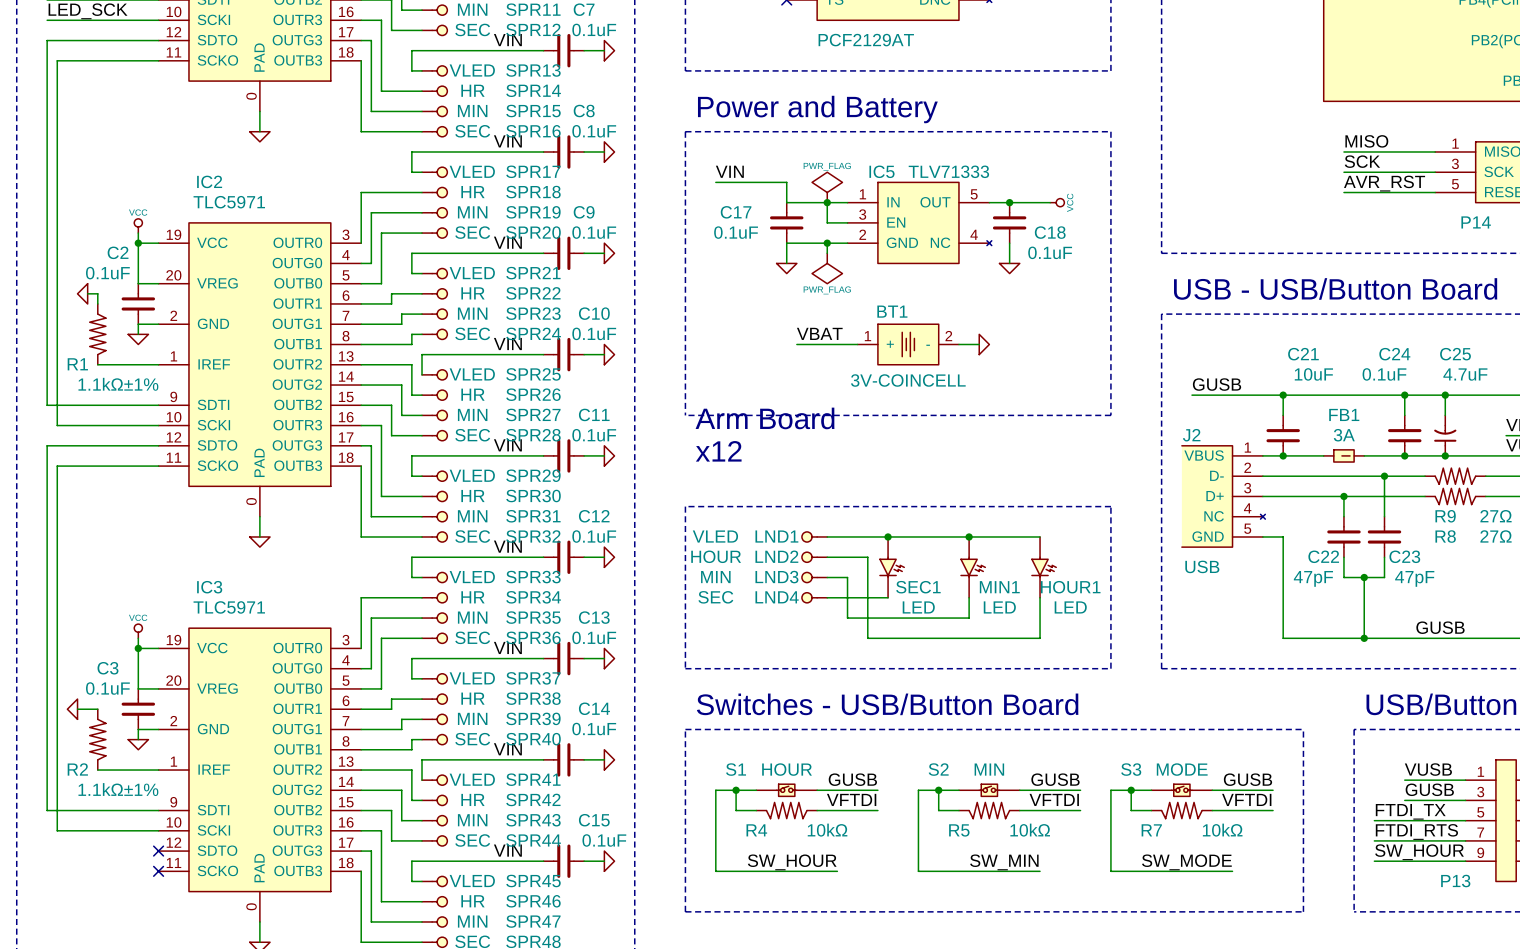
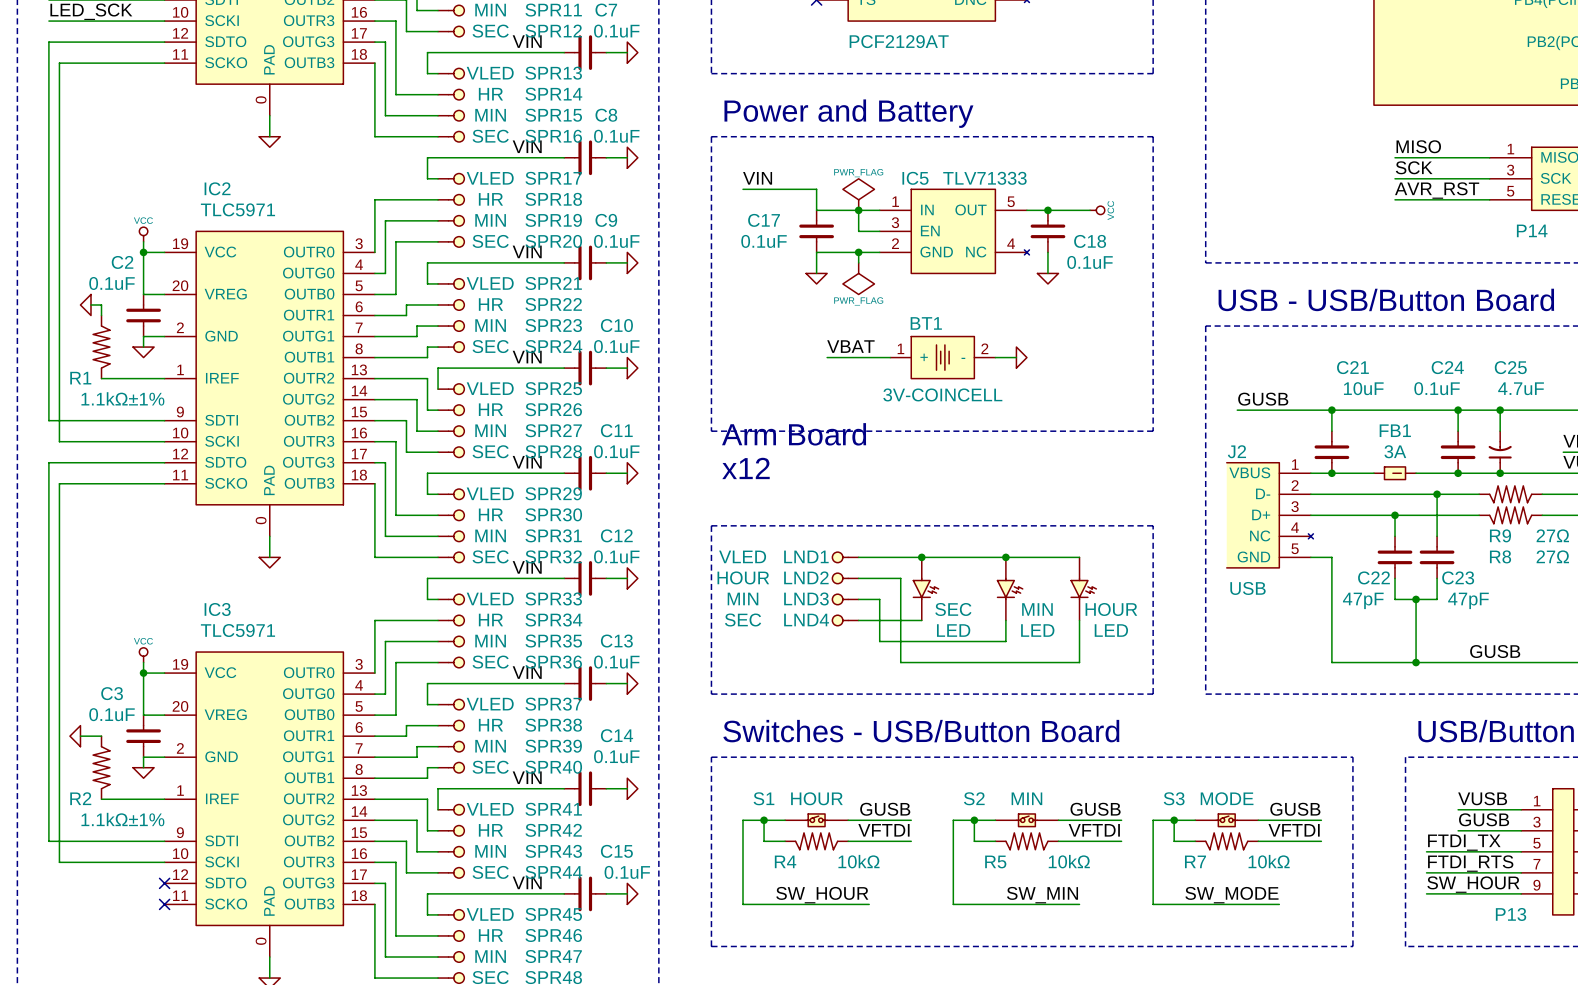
SEC1 name: SEC1 (918, 587) -> SEC (953, 609)
MIN1 name: MIN1 (999, 587) -> MIN (1037, 609)
HOUR1 name: HOUR1 (1070, 587) -> HOUR (1111, 609)

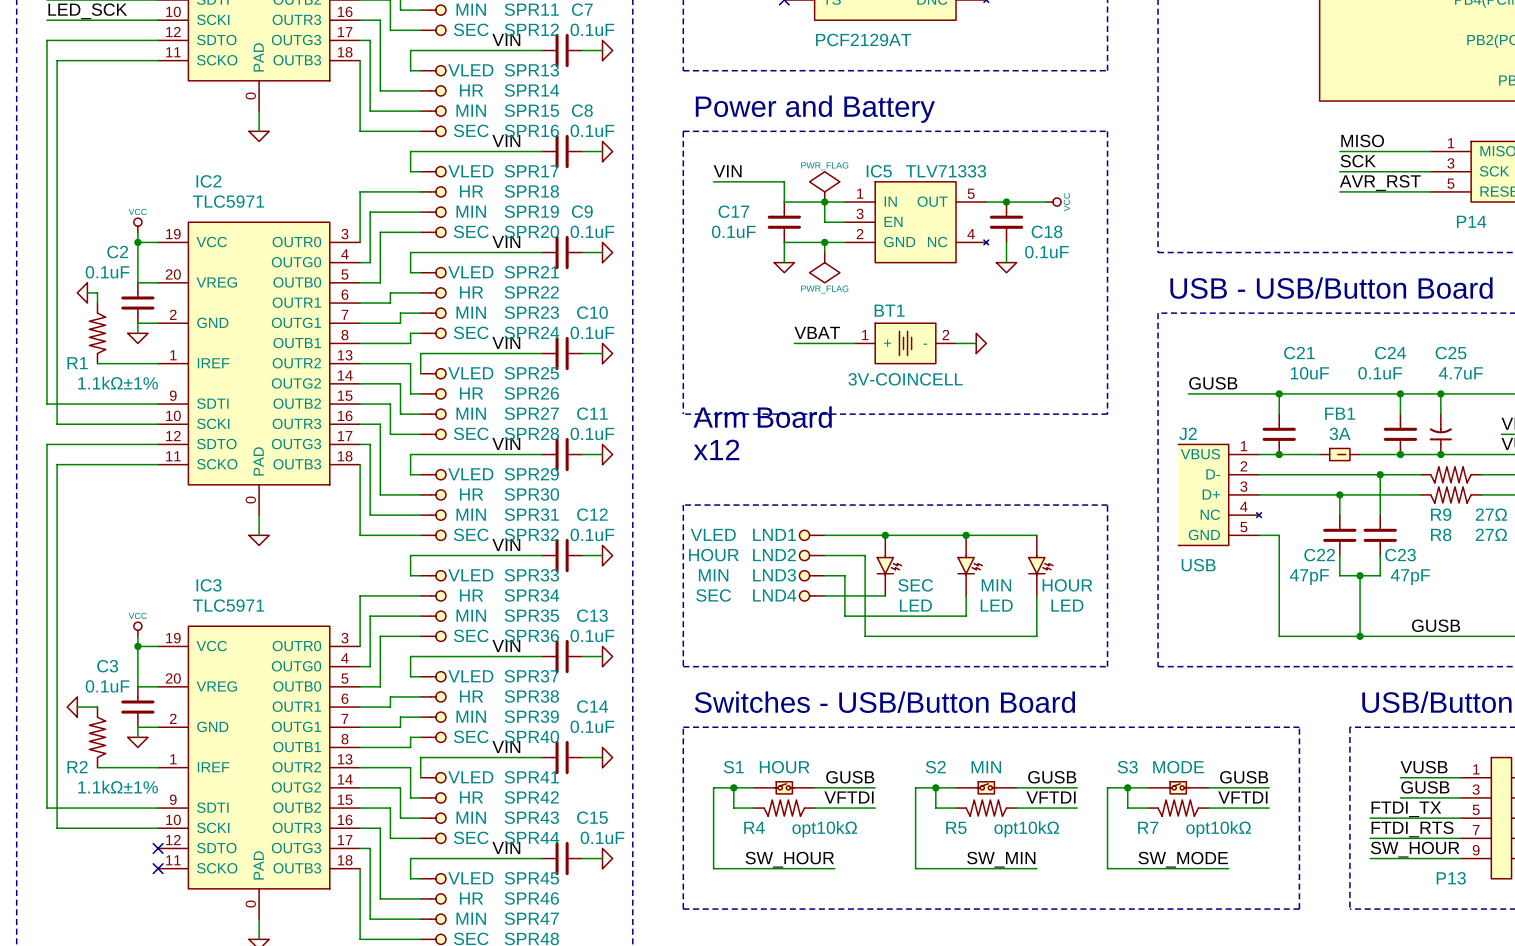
R4 value: 10kΩ (858, 861) -> opt10kΩ (824, 829)
R5 value: 10kΩ (1069, 861) -> opt10kΩ (1026, 829)
R7 value: 10kΩ (1269, 861) -> opt10kΩ (1218, 829)

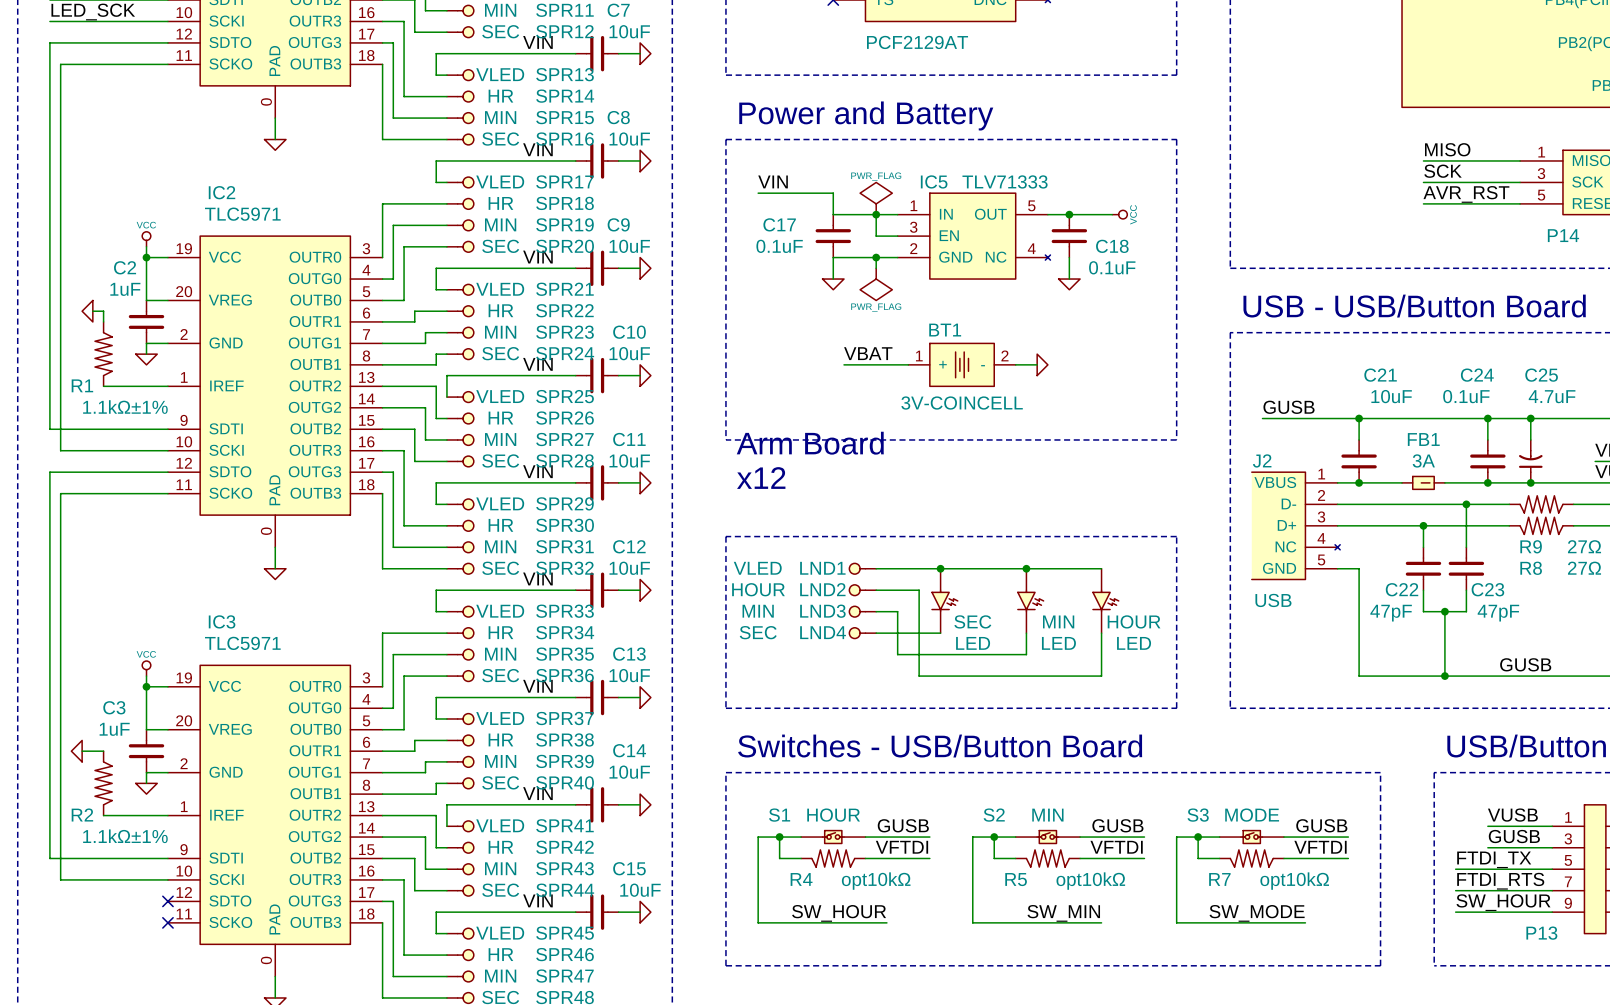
C7 value: 0.1uF (592, 29) -> 10uF (629, 31)
C8 value: 0.1uF (592, 130) -> 10uF (629, 139)
C9 value: 0.1uF (592, 231) -> 10uF (629, 246)
C2 value: 0.1uF (107, 272) -> 1uF (125, 289)
C10 value: 0.1uF (592, 332) -> 10uF (629, 353)
C11 value: 0.1uF (592, 433) -> 10uF (629, 460)
C12 value: 0.1uF (592, 534) -> 10uF (629, 568)
C13 value: 0.1uF (592, 635) -> 10uF (629, 675)
C3 value: 0.1uF (107, 686) -> 1uF (114, 729)
C14 value: 0.1uF (592, 726) -> 10uF (629, 772)
C15 value: 0.1uF (602, 837) -> 10uF (640, 890)

